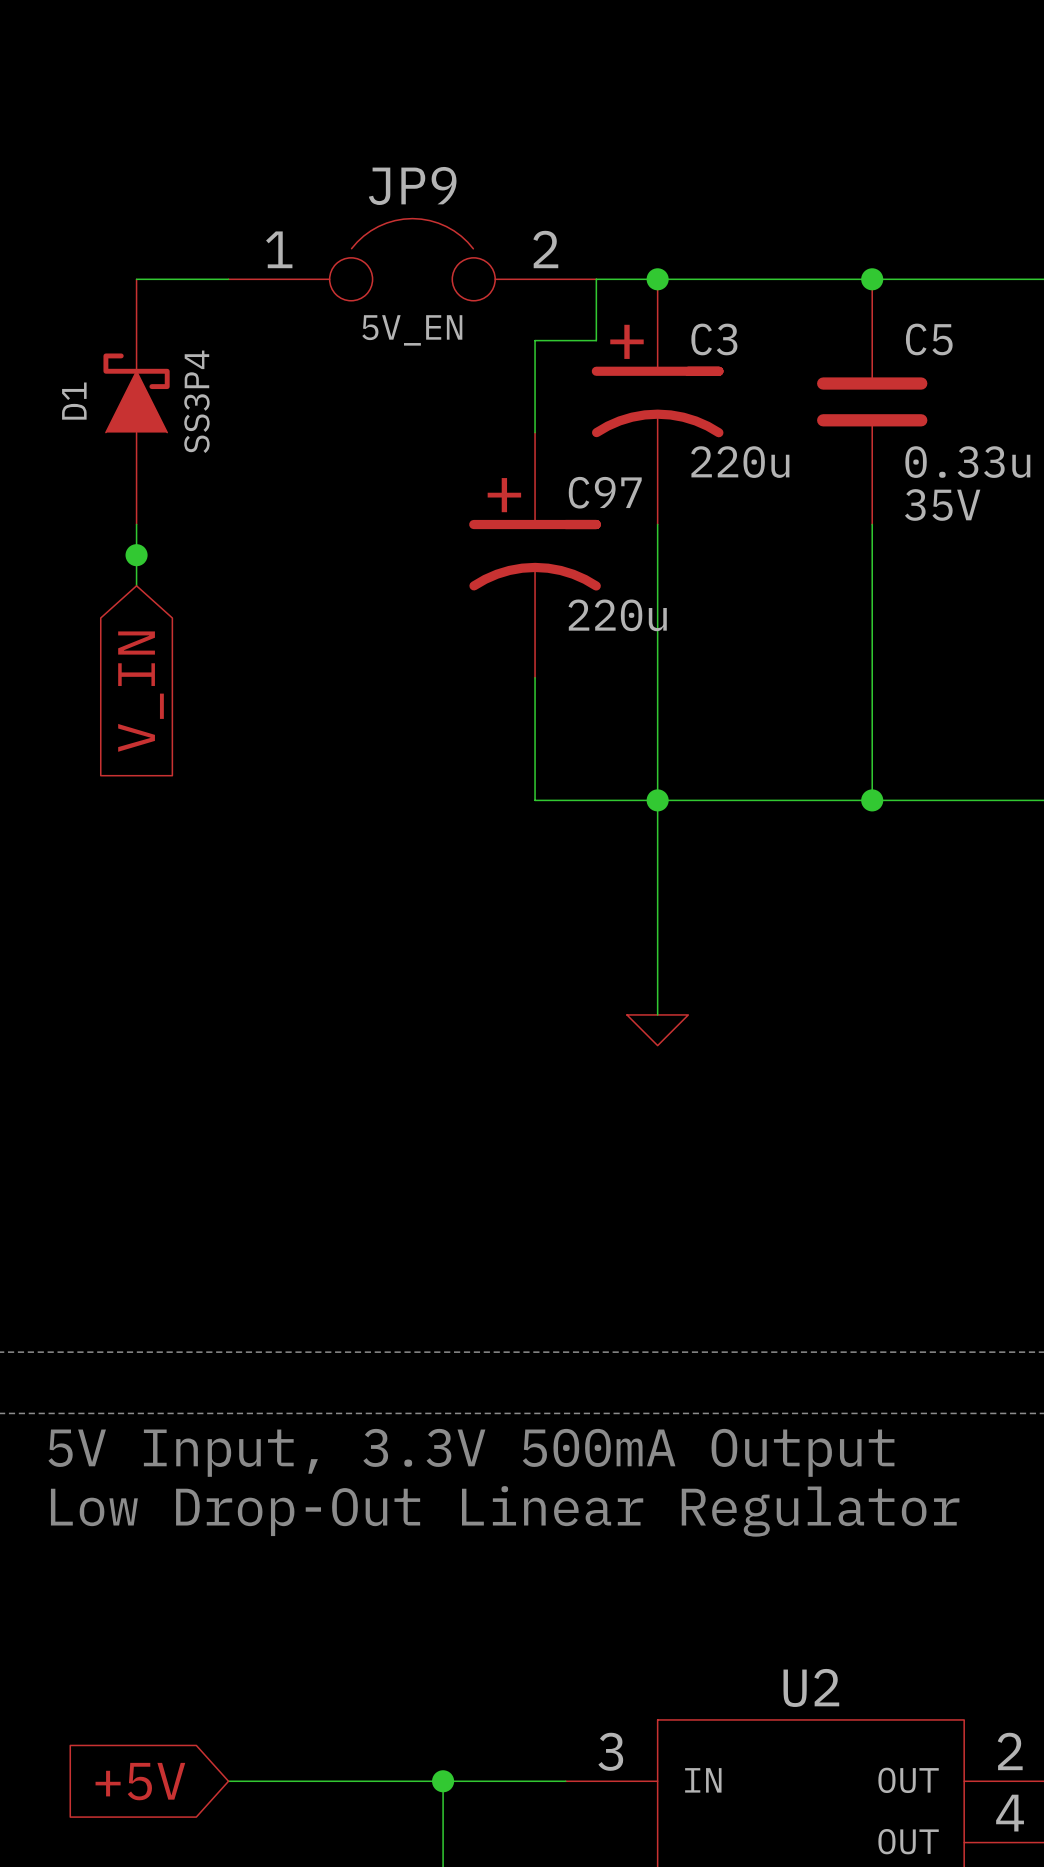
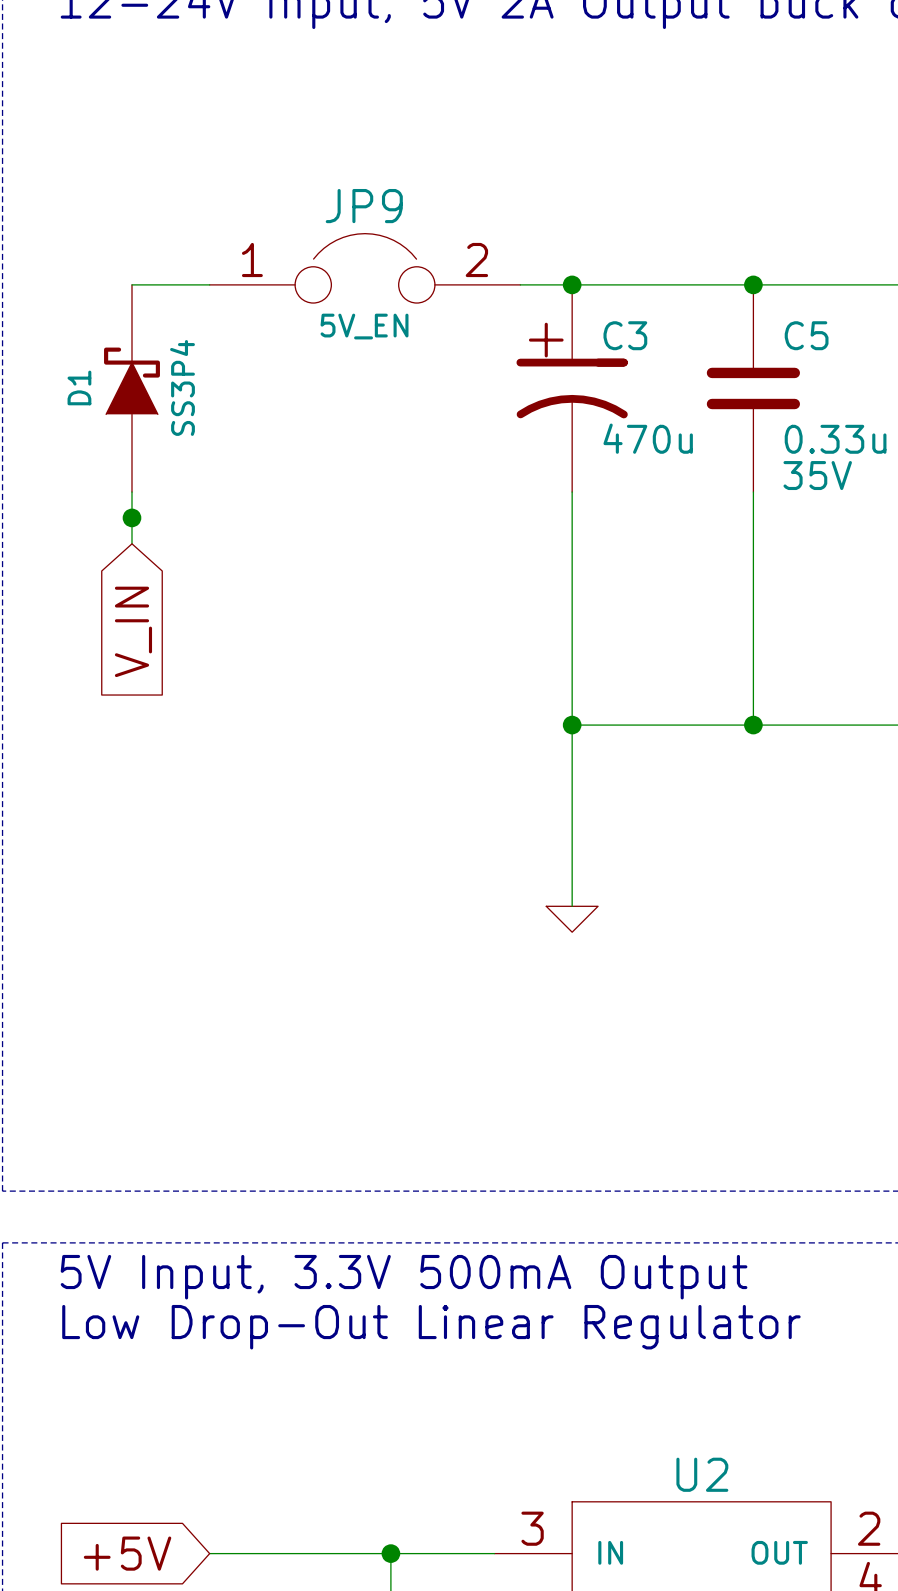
wire: (596, 279) (596, 340) (535, 340) (535, 432) -> none
C3 value: 220u (740, 462) -> 470u (648, 438)
C97: 220u (535, 555) -> none
wire: (535, 677) (535, 800) (657, 800) -> none

